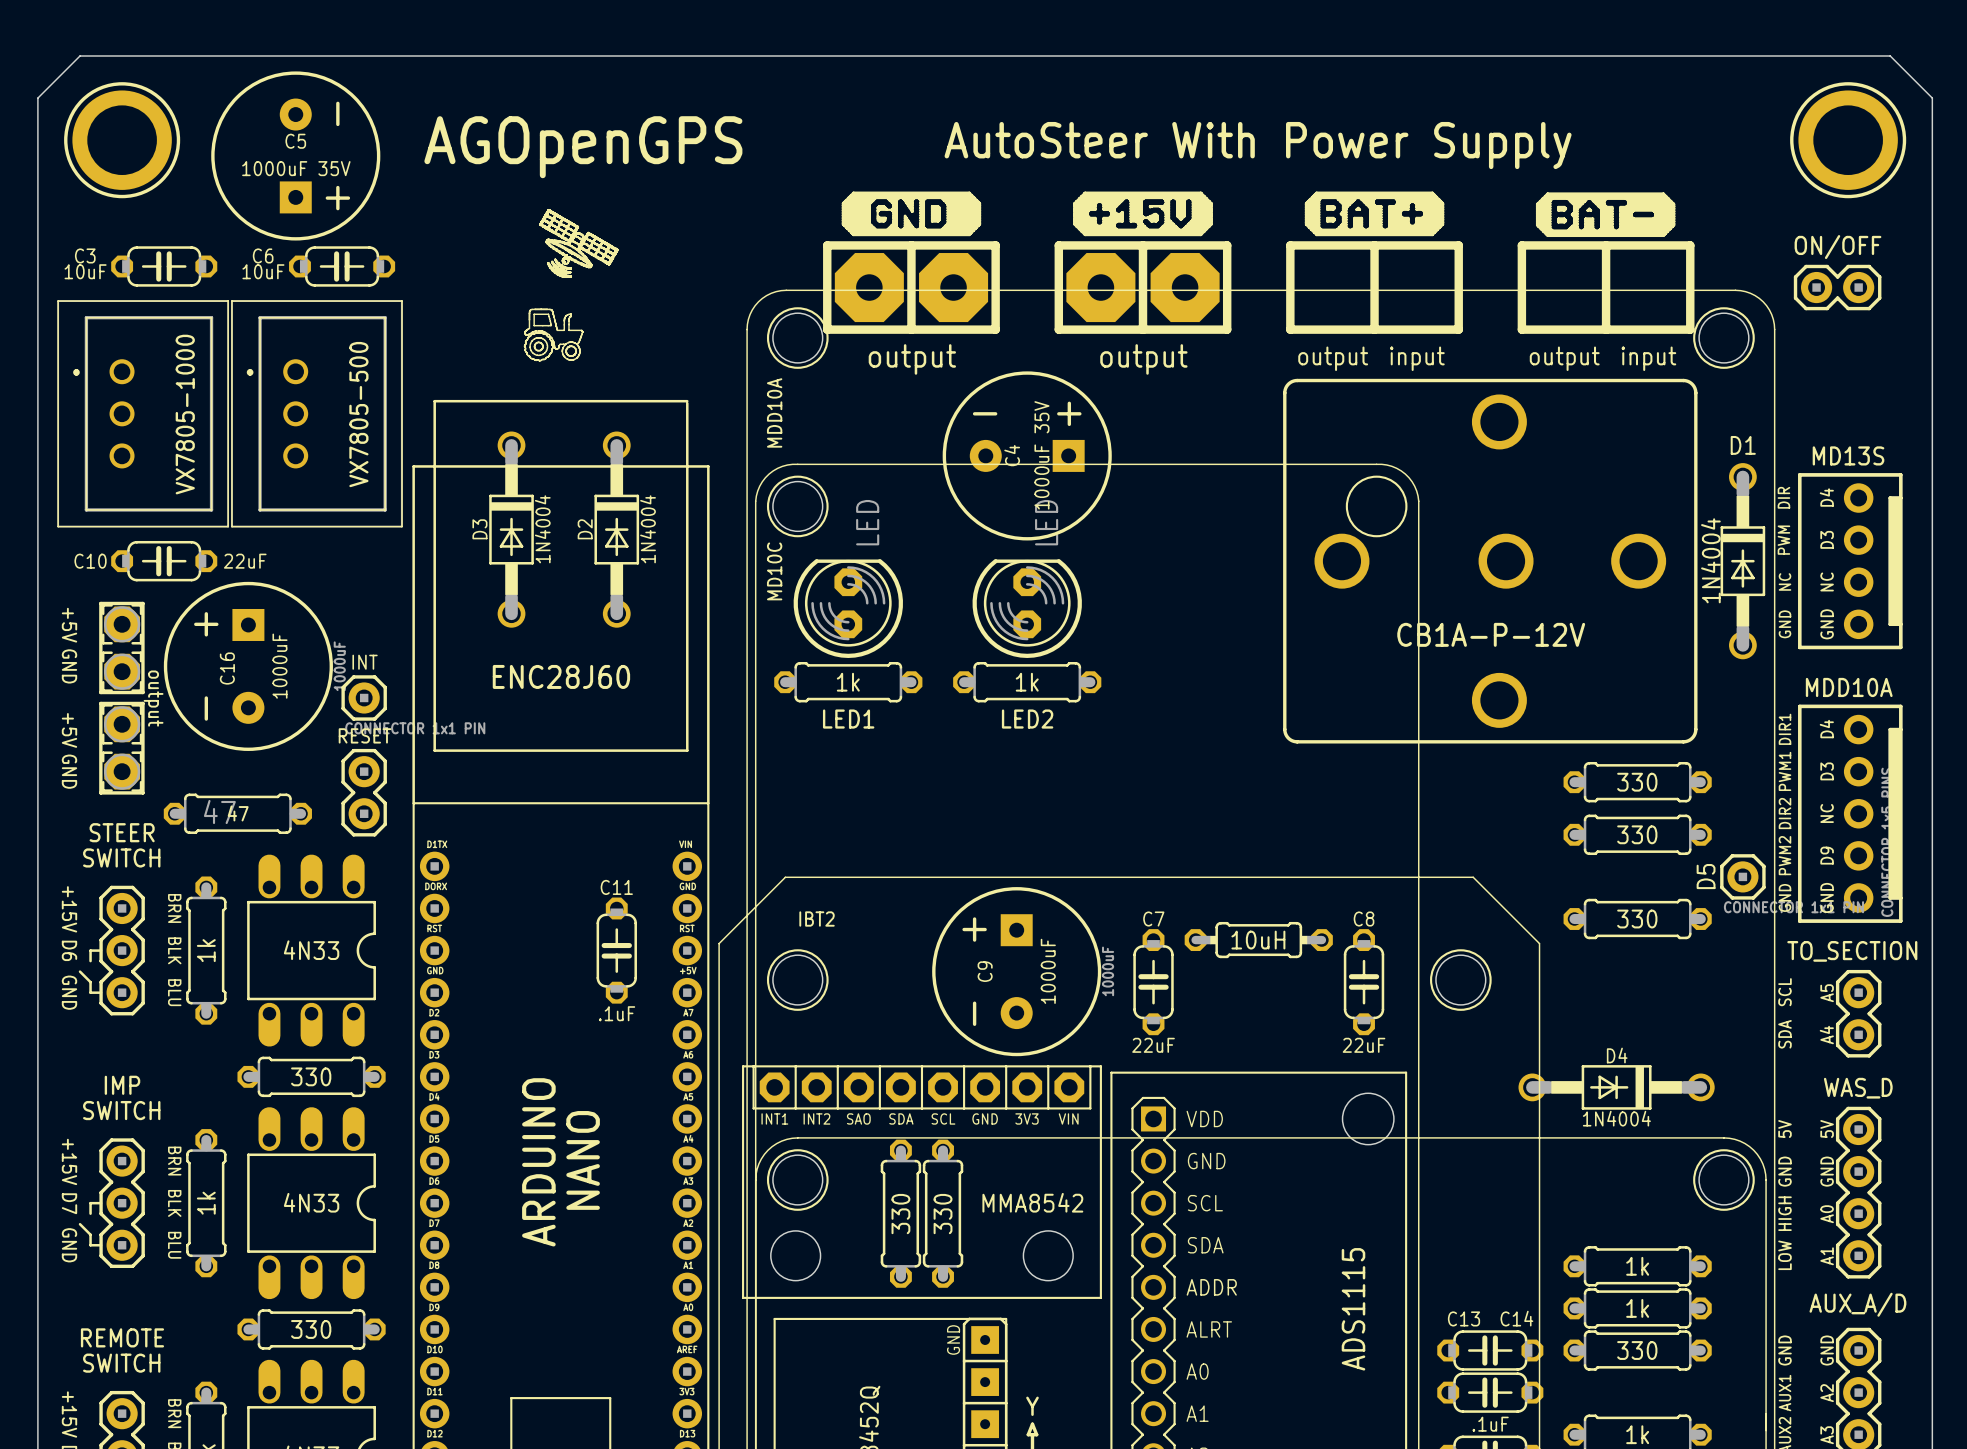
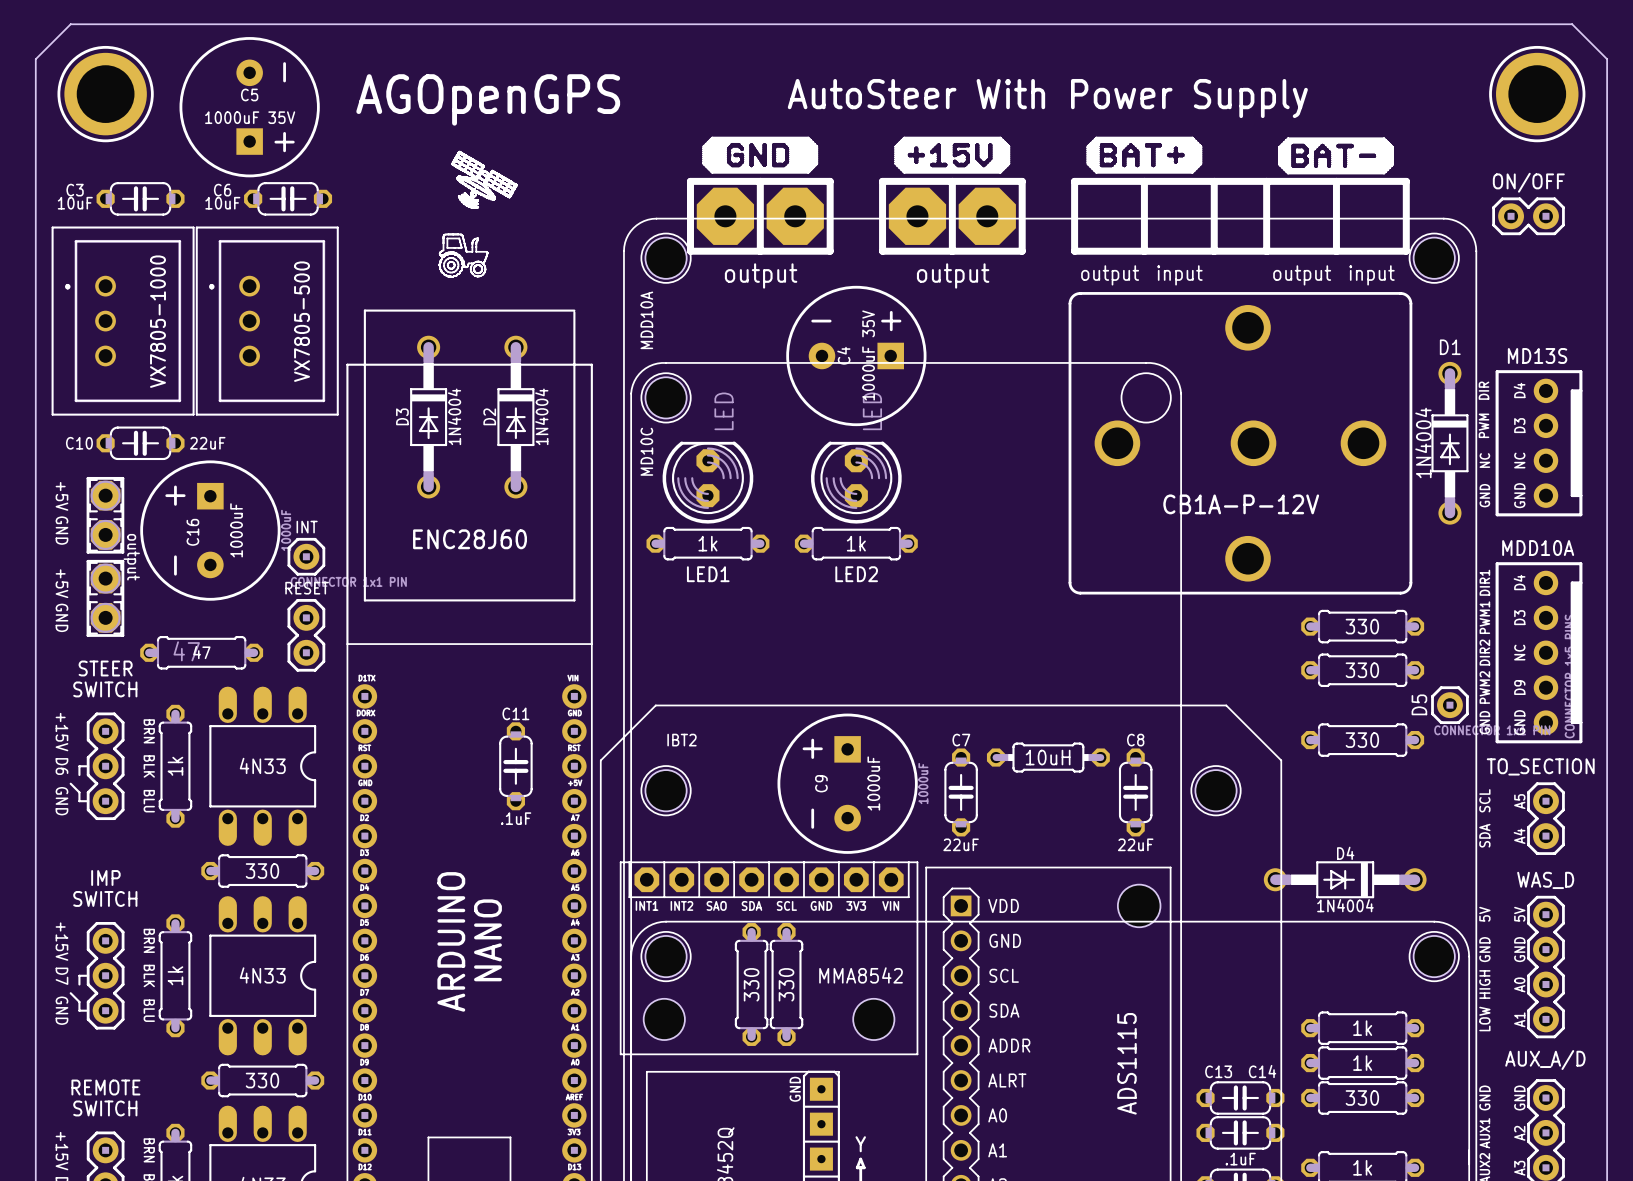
line: none -> (1214, 181) (1266, 181)
line: none -> (1214, 251) (1266, 251)

